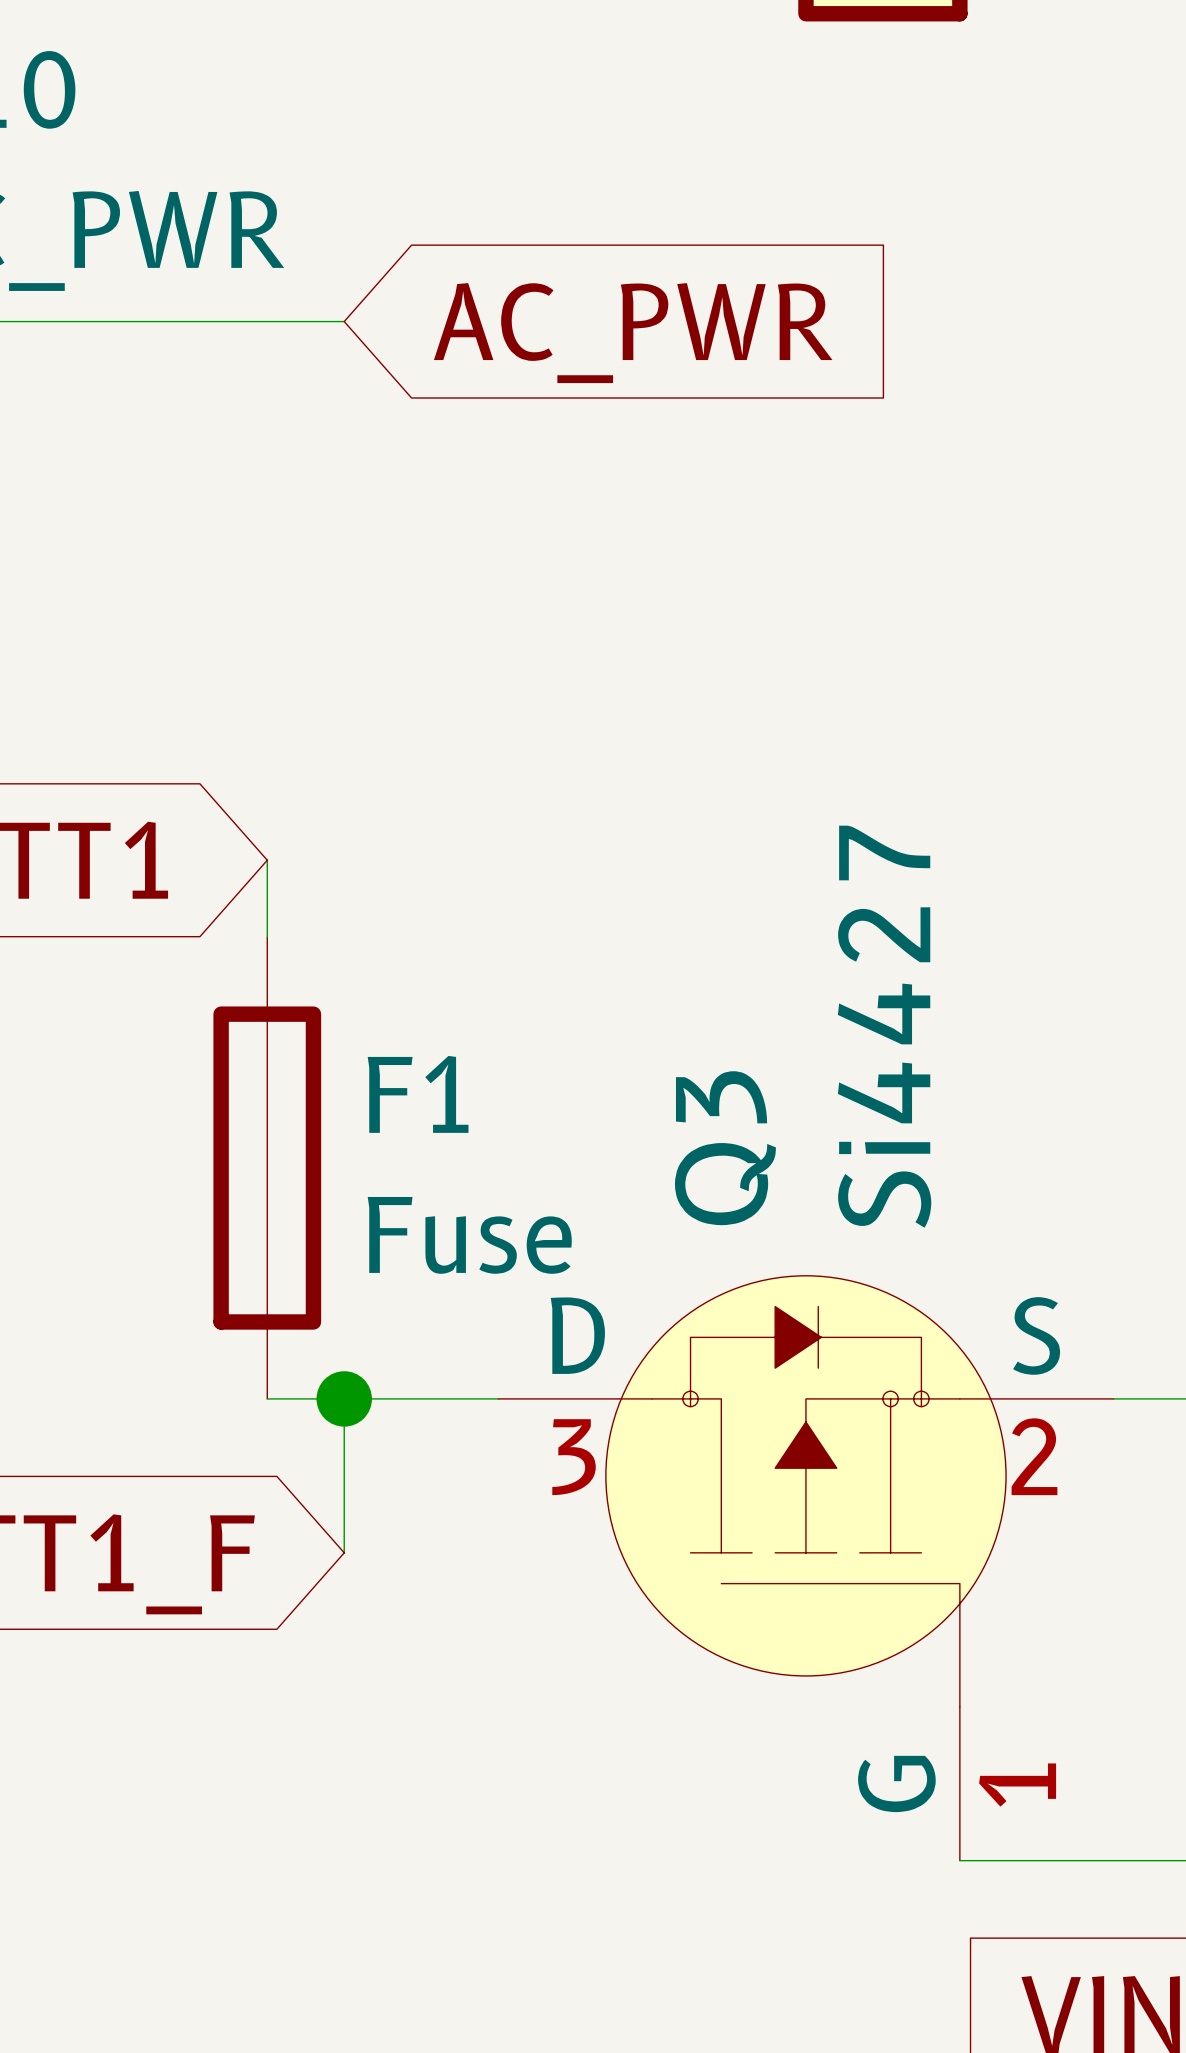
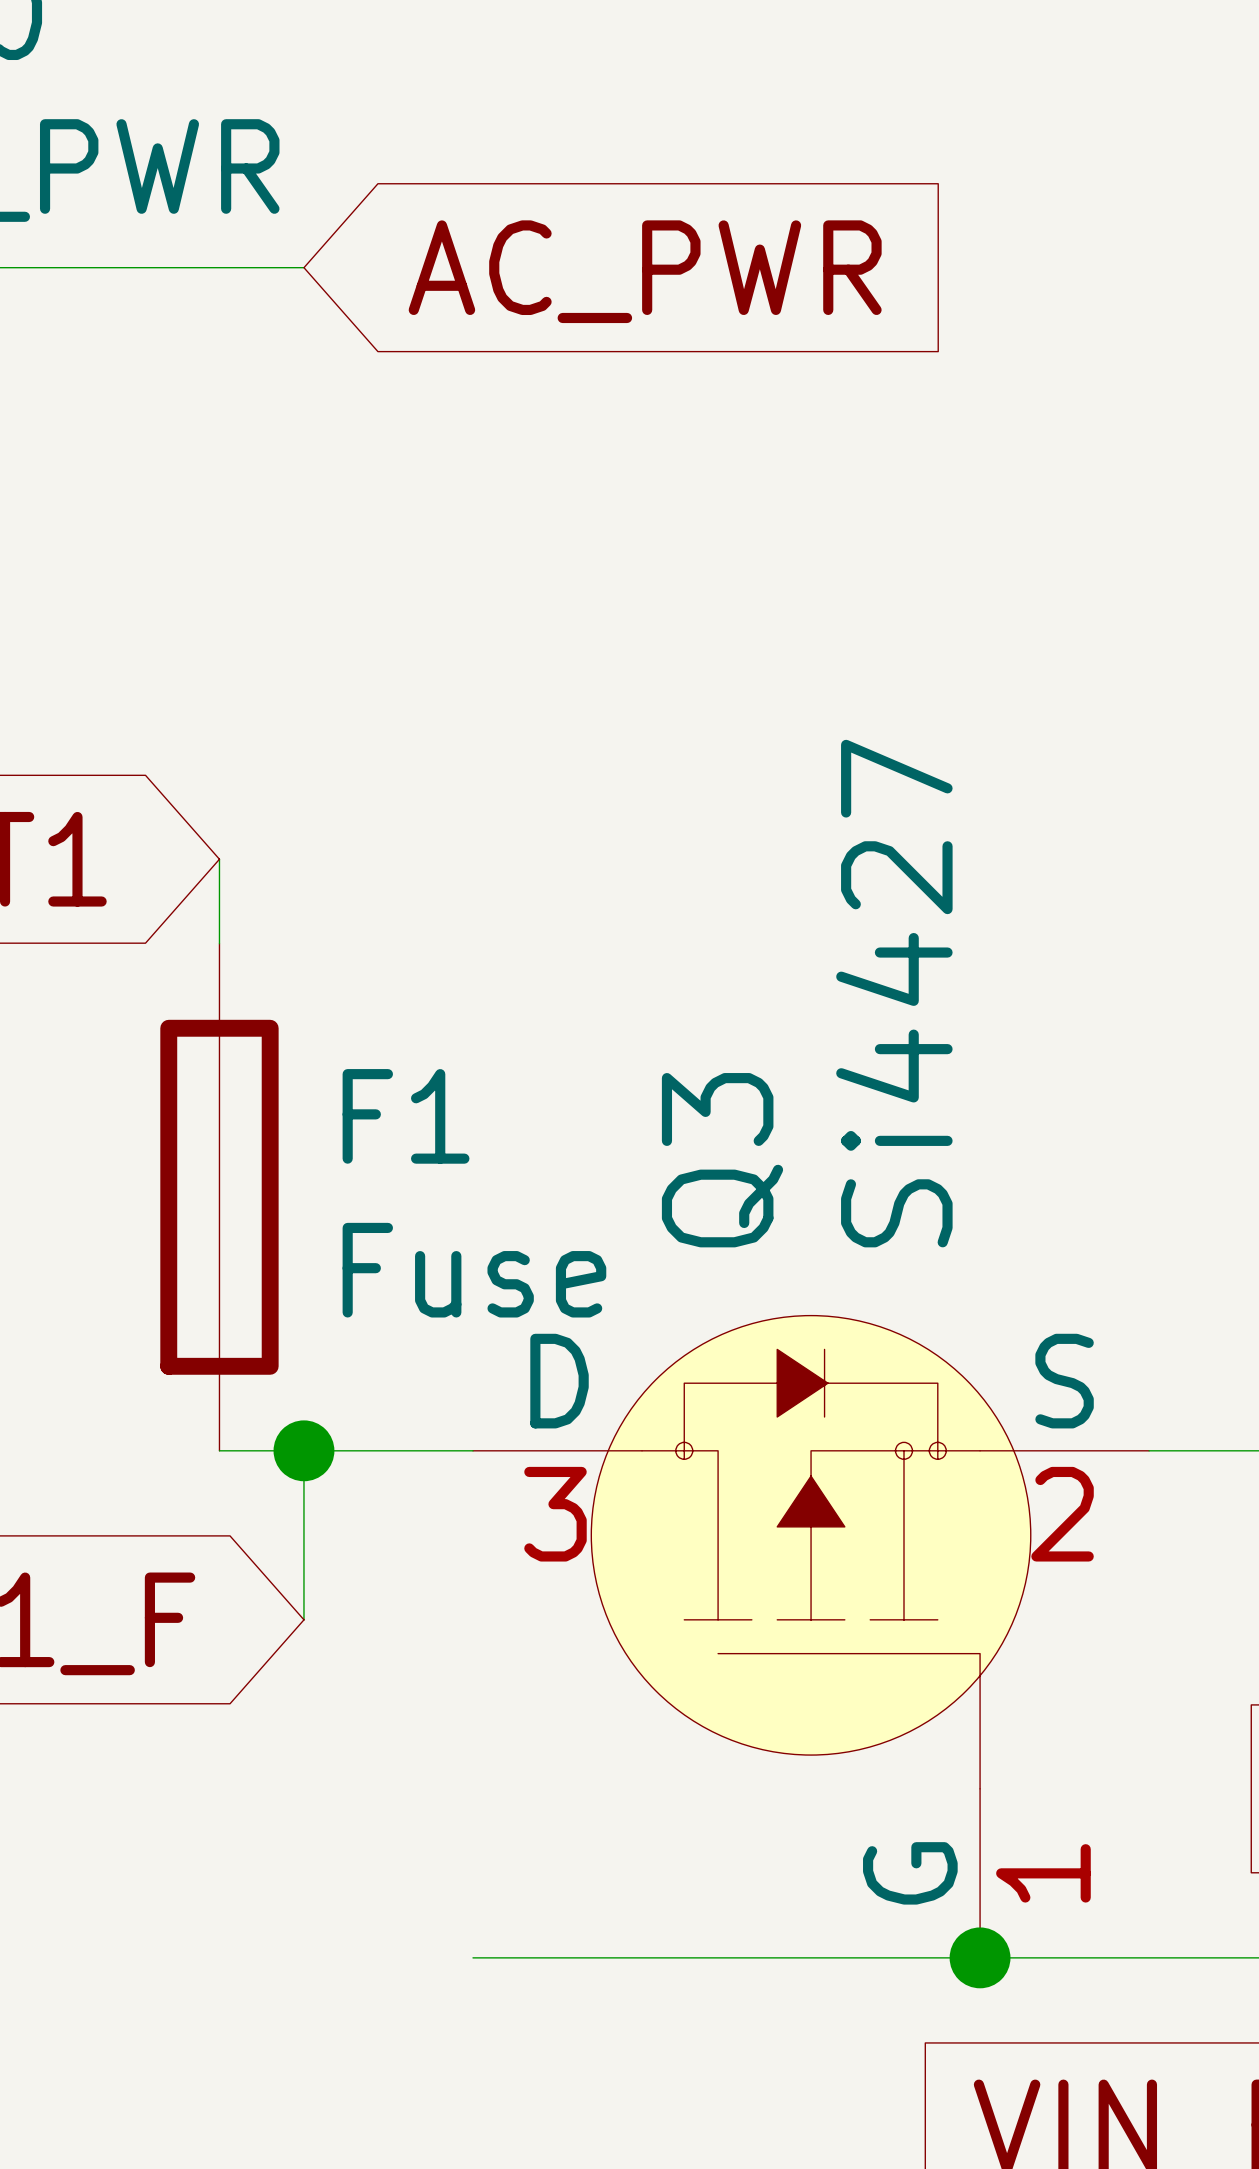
wire: none -> (472, 1957) (980, 1957)
junction: none -> (980, 1957)

